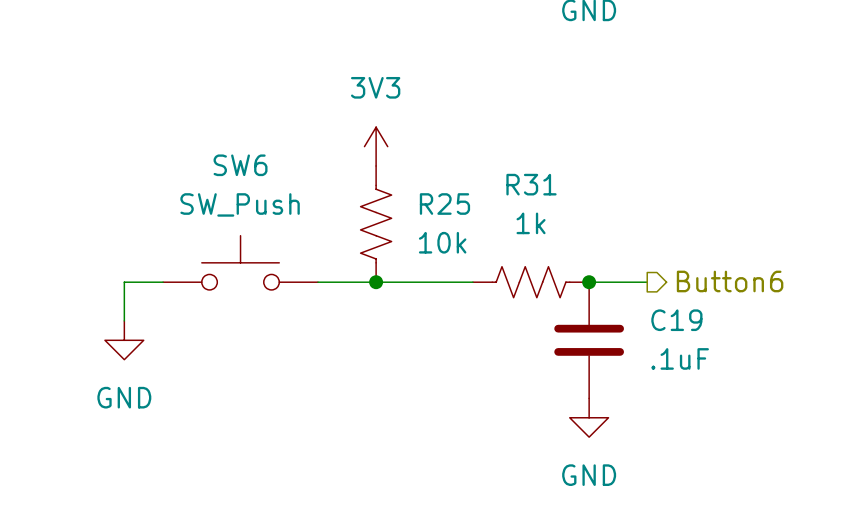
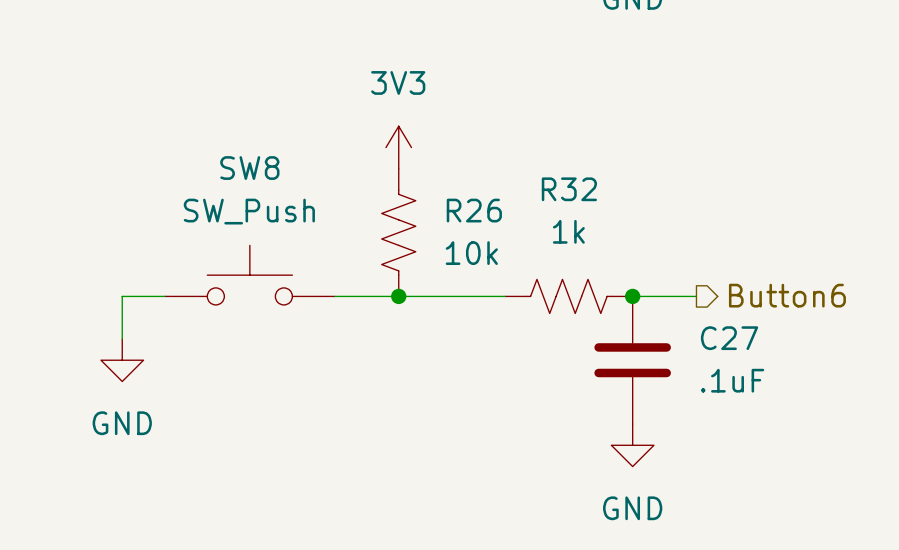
SW6 name: SW6 (240, 165) -> SW8 (249, 168)
R31 name: R31 (531, 184) -> R32 (569, 189)
R25 name: R25 (444, 204) -> R26 (474, 210)
C19 name: C19 (676, 320) -> C27 (729, 338)

